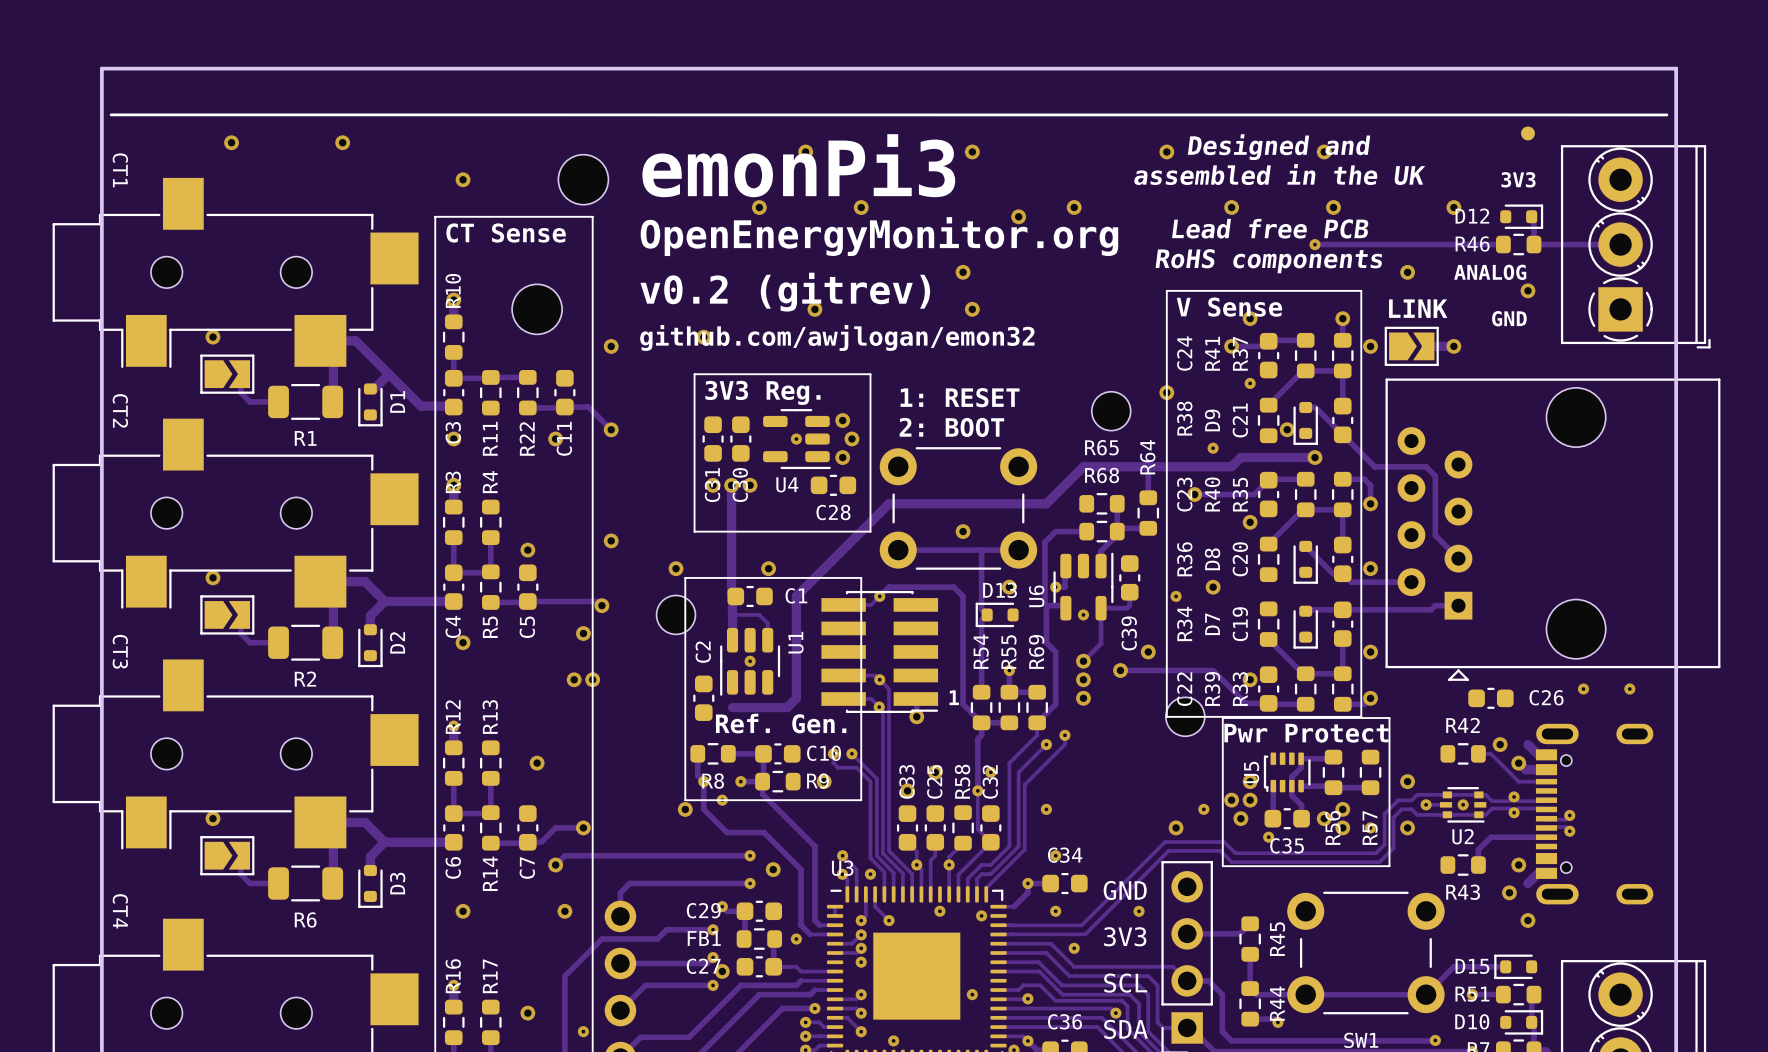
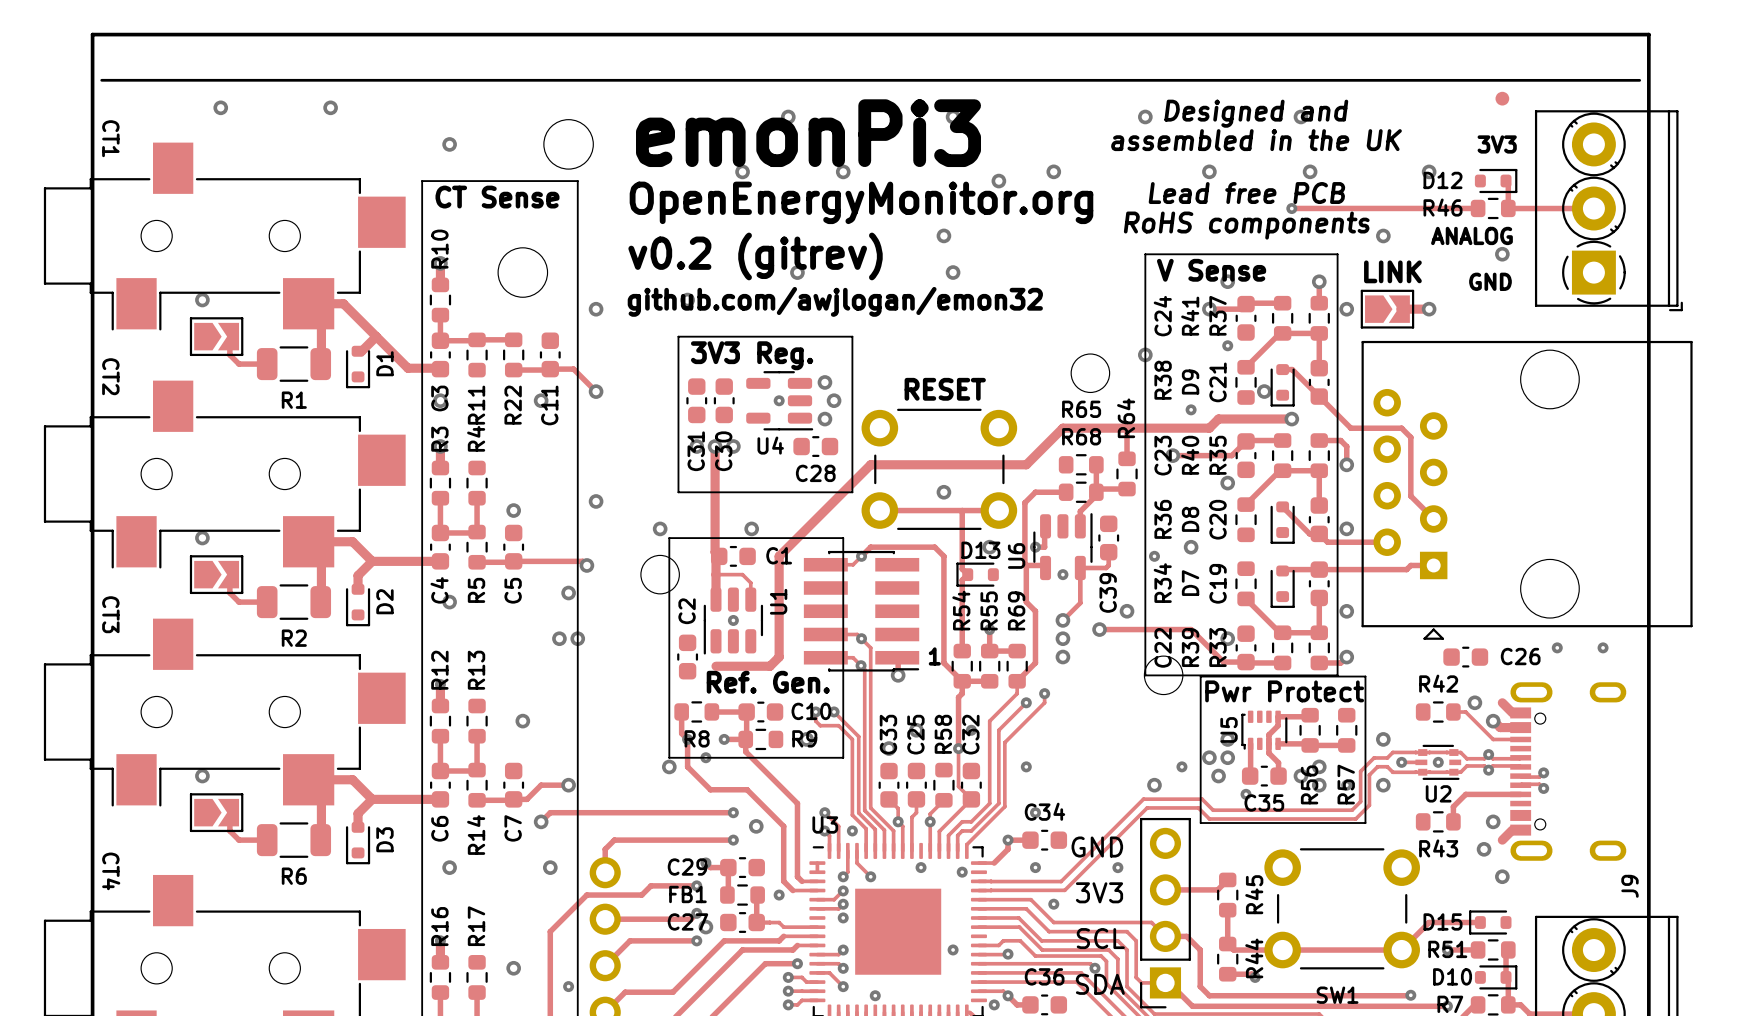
text: 1: RESET (960, 397) -> RESET (945, 389)
text: 2: BOOT (951, 427) -> none
J9 name: none -> J9 (1629, 886)

